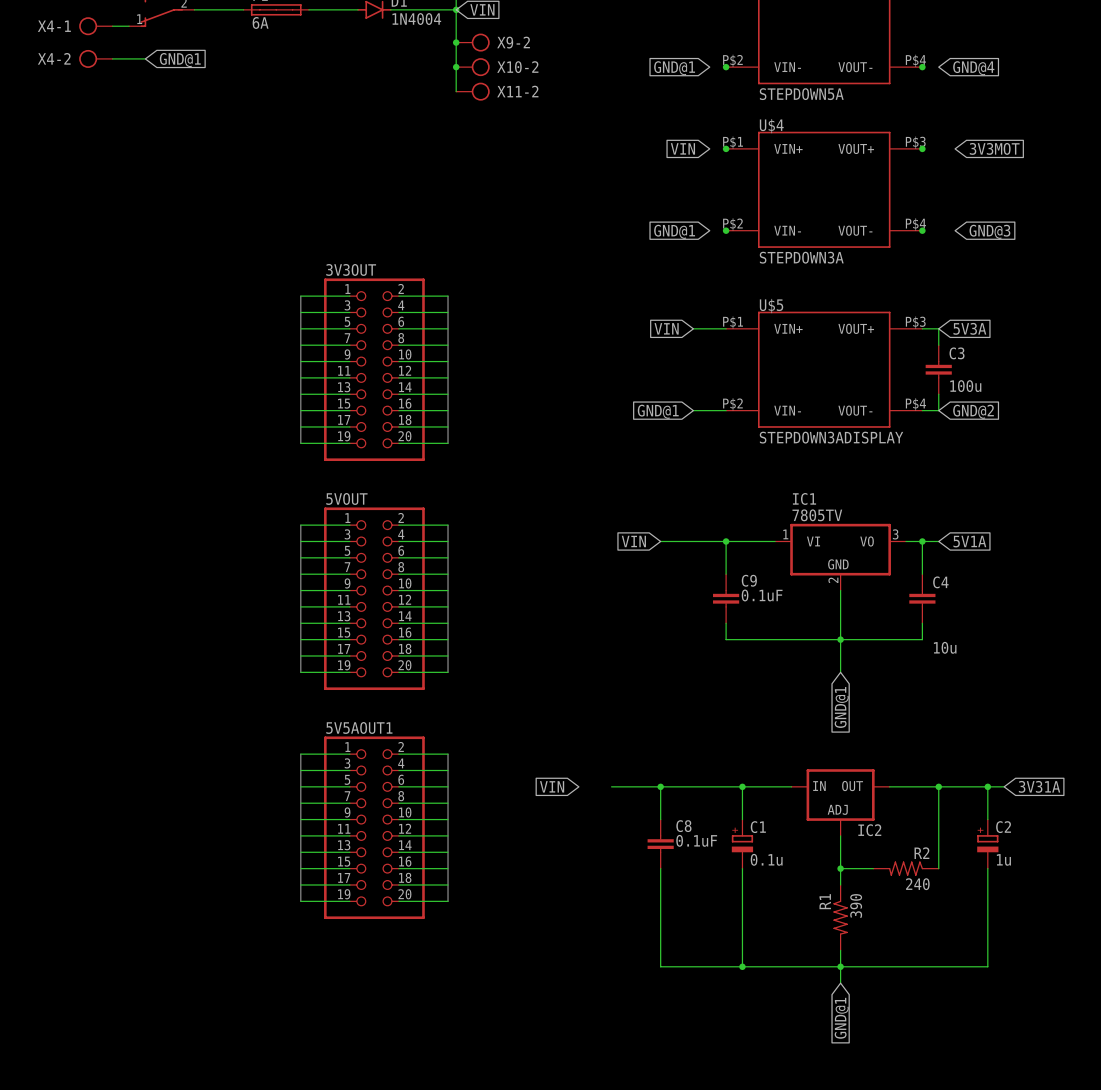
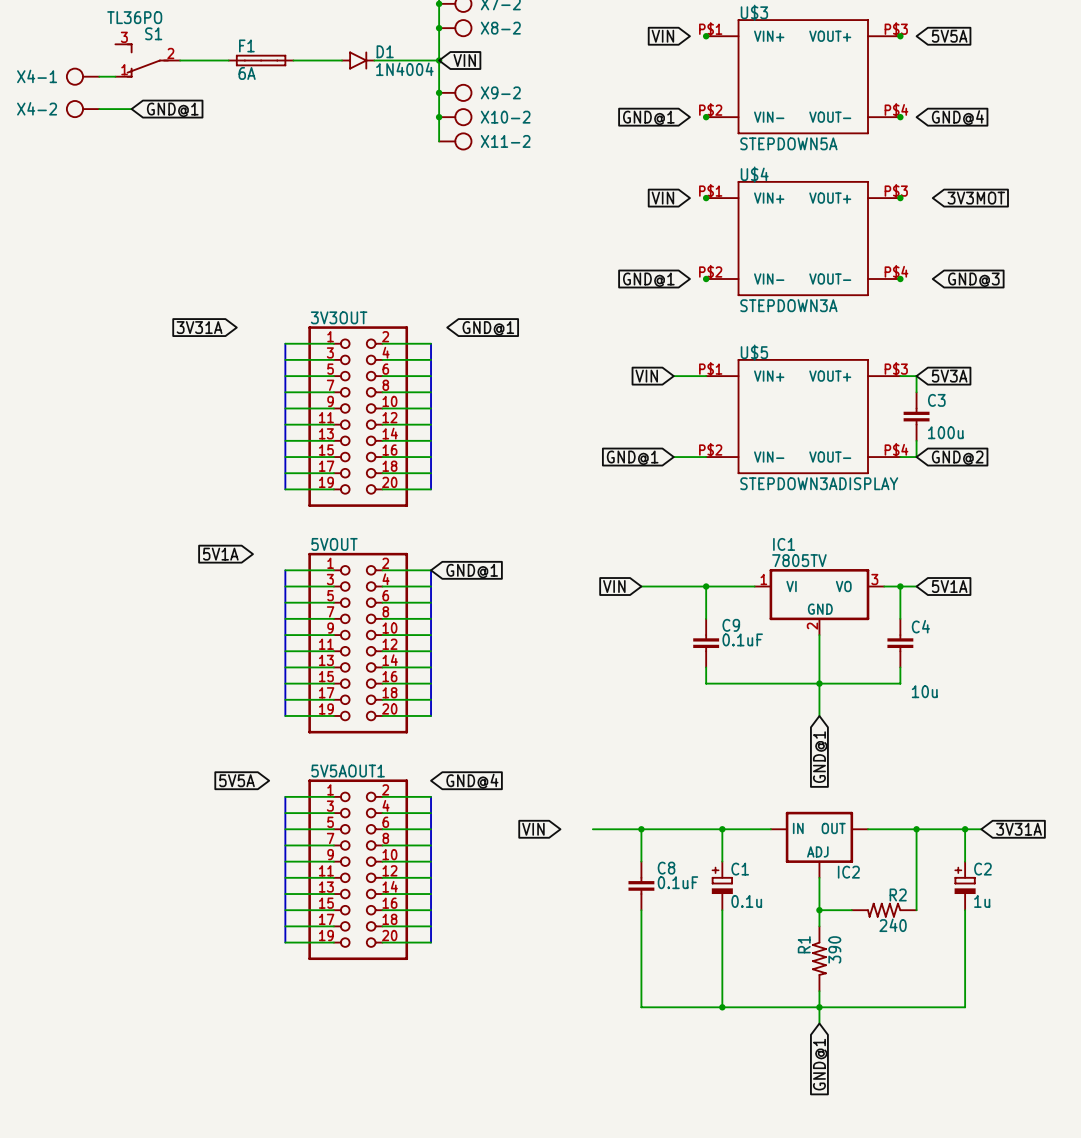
global label: none -> 3V31A (199, 327)
global label: none -> GND@1 (488, 328)
global label: none -> 5V1A (220, 554)
global label: none -> GND@1 (472, 571)
global label: none -> 5V5A (237, 780)
global label: none -> GND@4 (472, 781)

